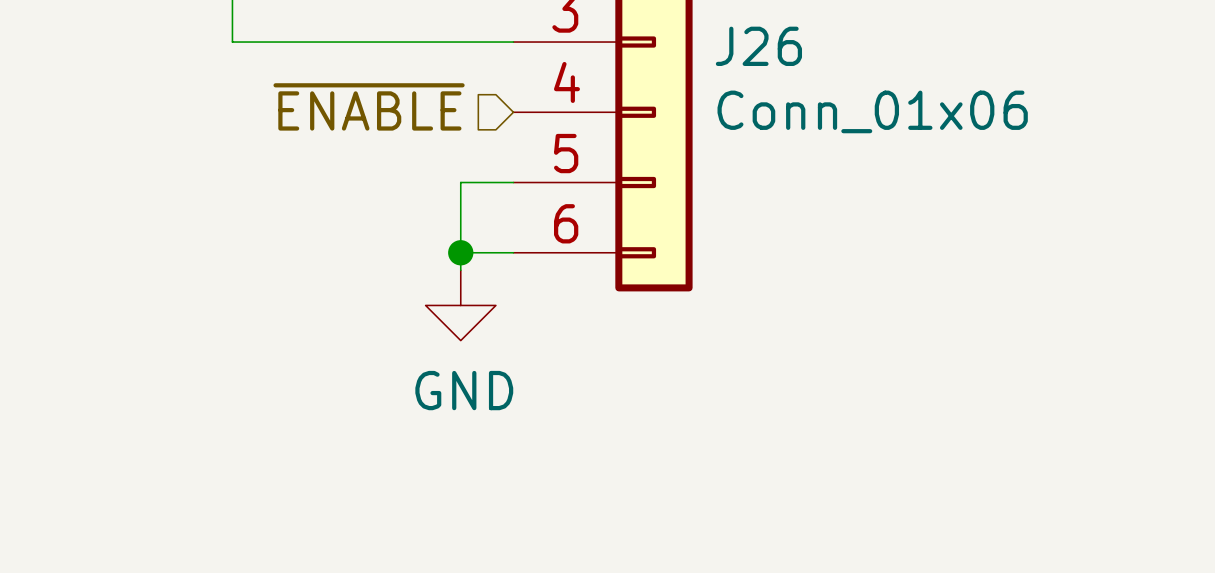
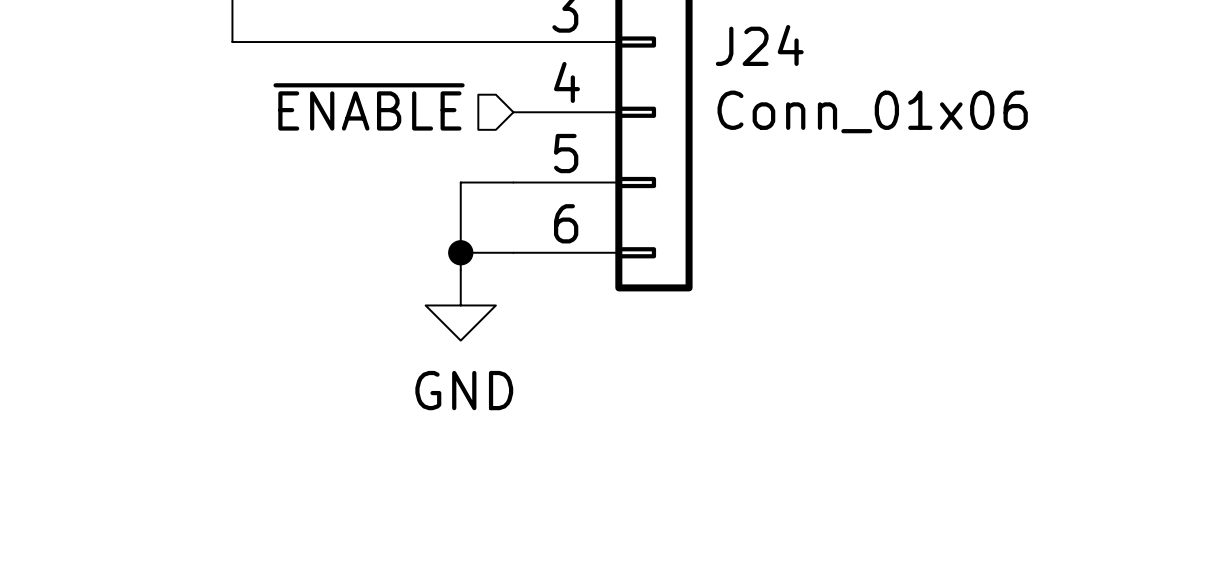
J26 name: J26 (758, 46) -> J24 (759, 45)

